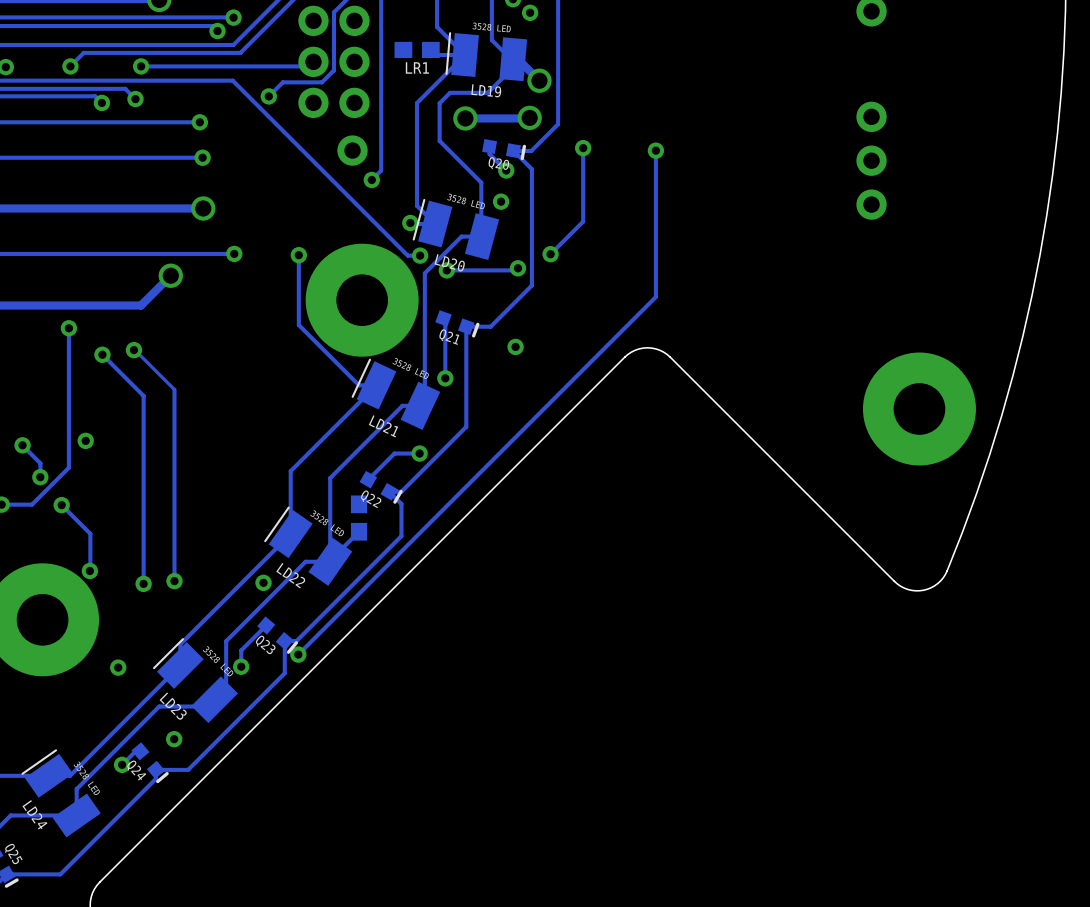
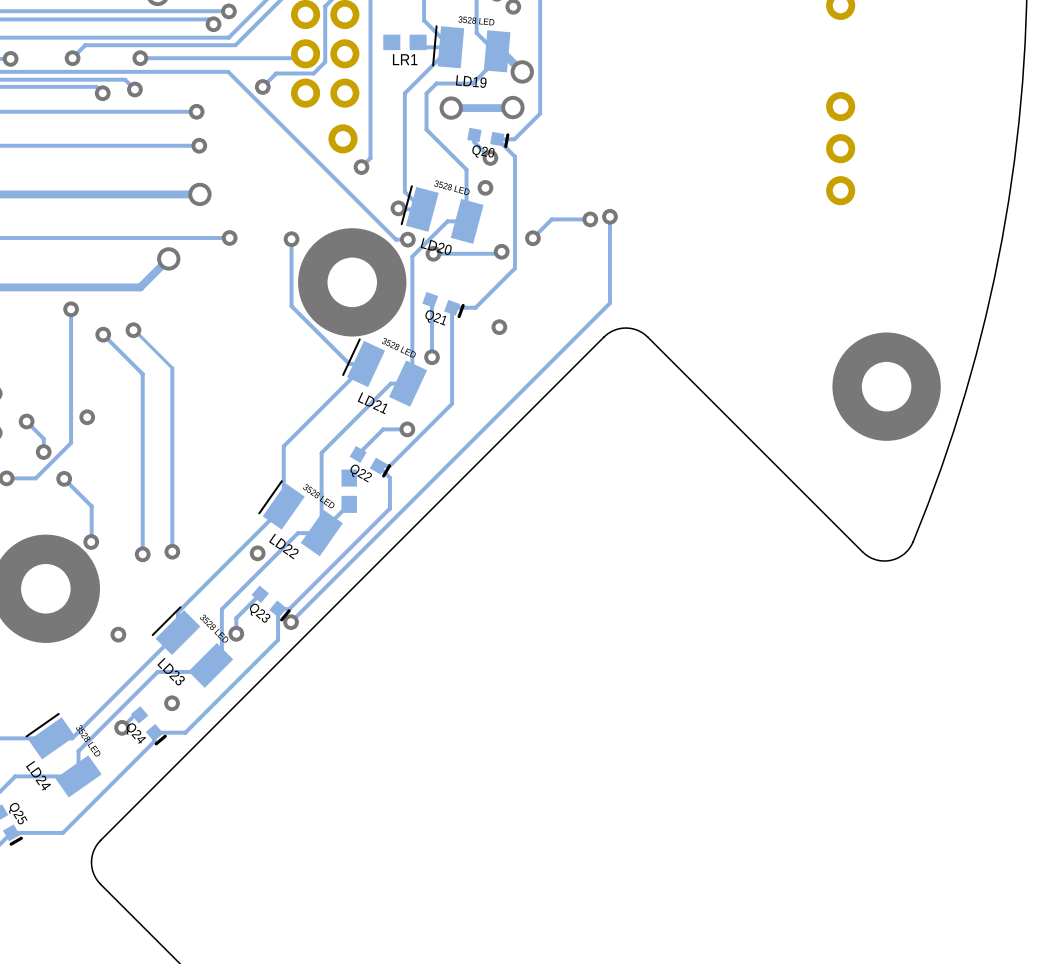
track: (583, 148) (583, 221) (570, 234) -> (590, 219) (551, 219)
via: (583, 148) -> none
track: (655, 150) (655, 297) (630, 321) -> (609, 216) (609, 303)
via: (655, 150) -> none
via: none -> (609, 216)
via: none -> (590, 219)

